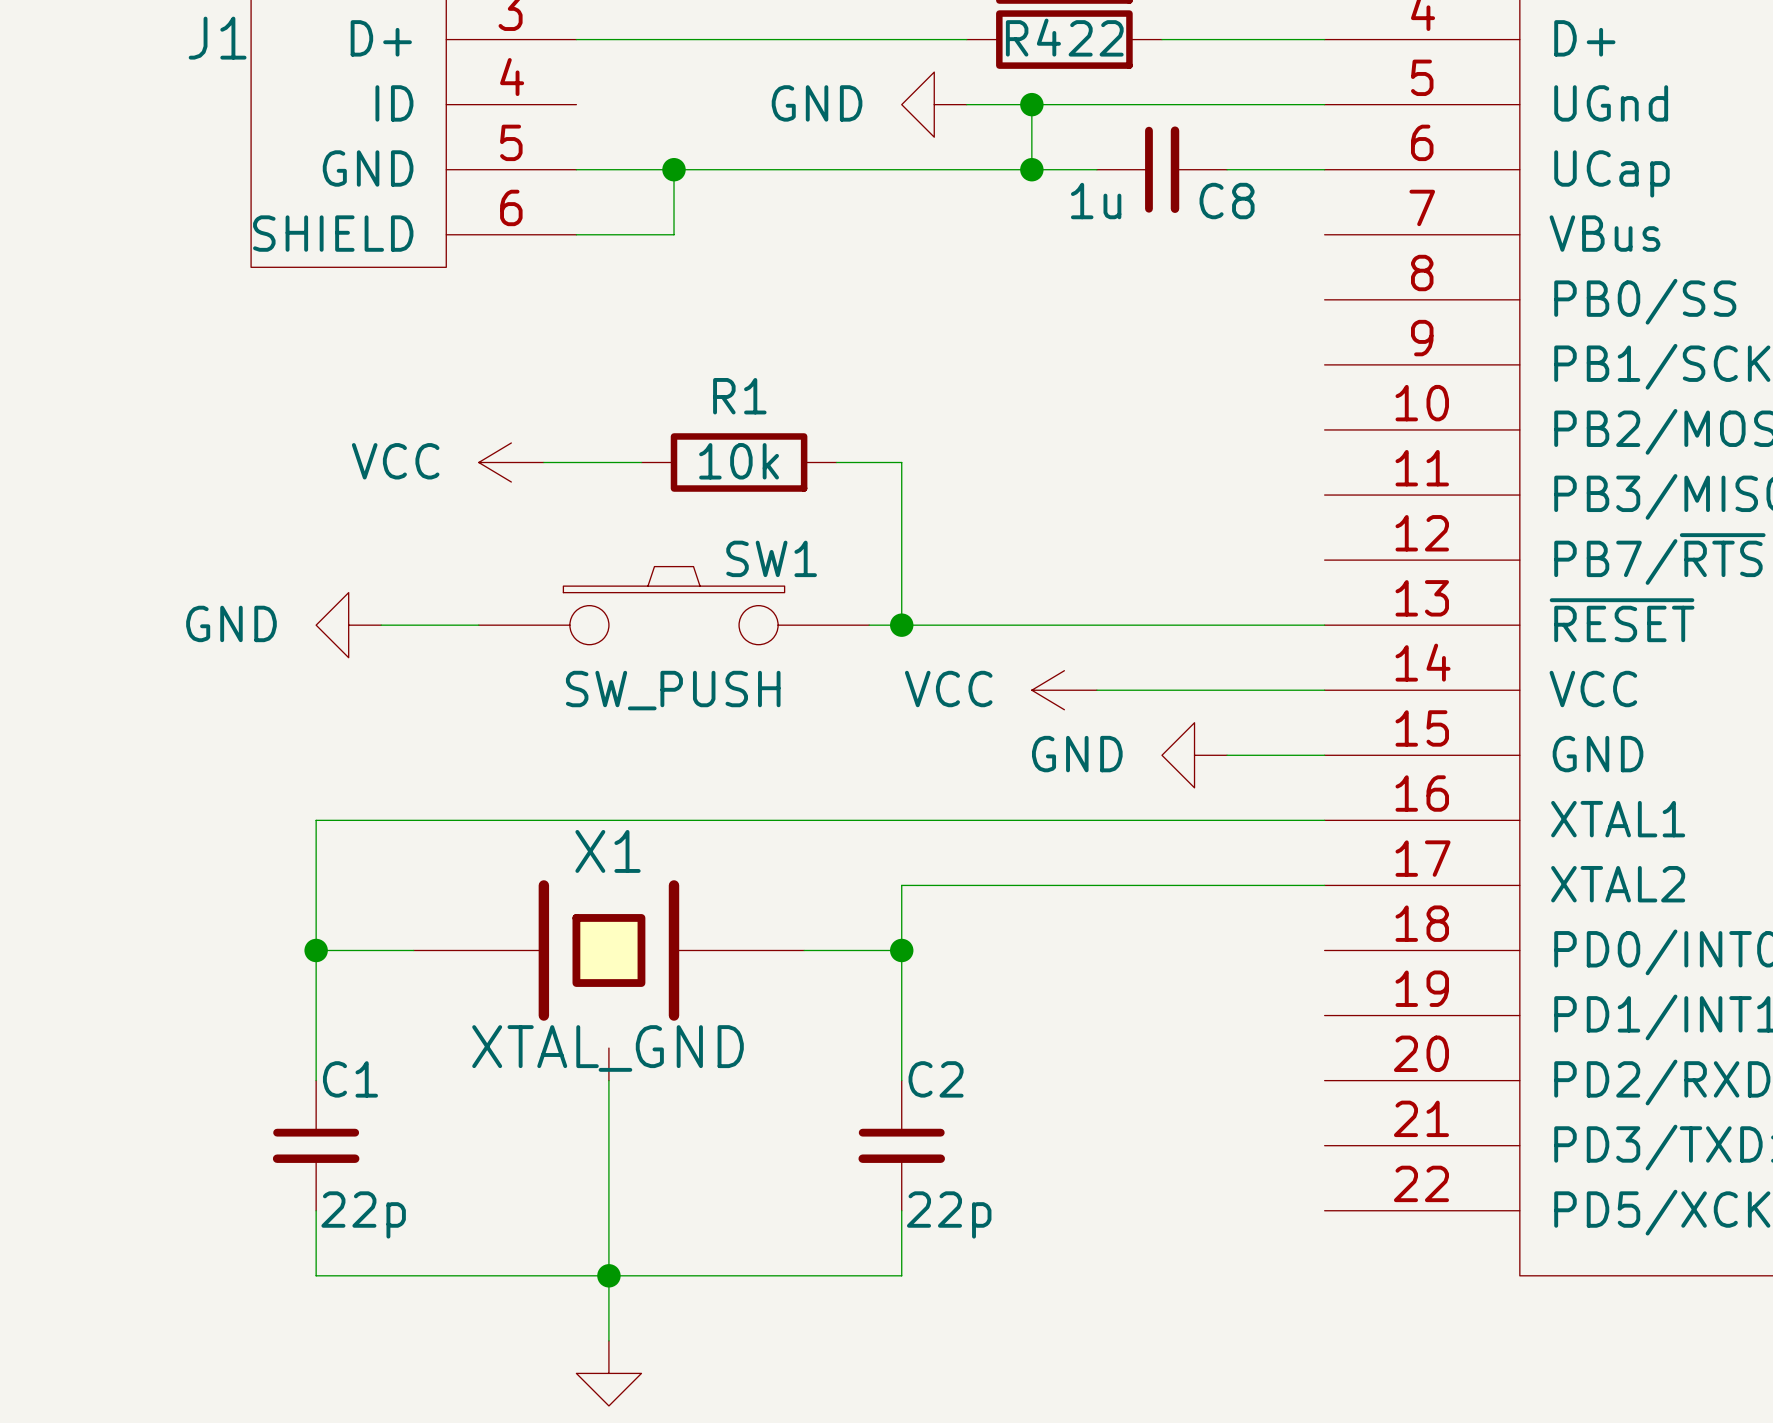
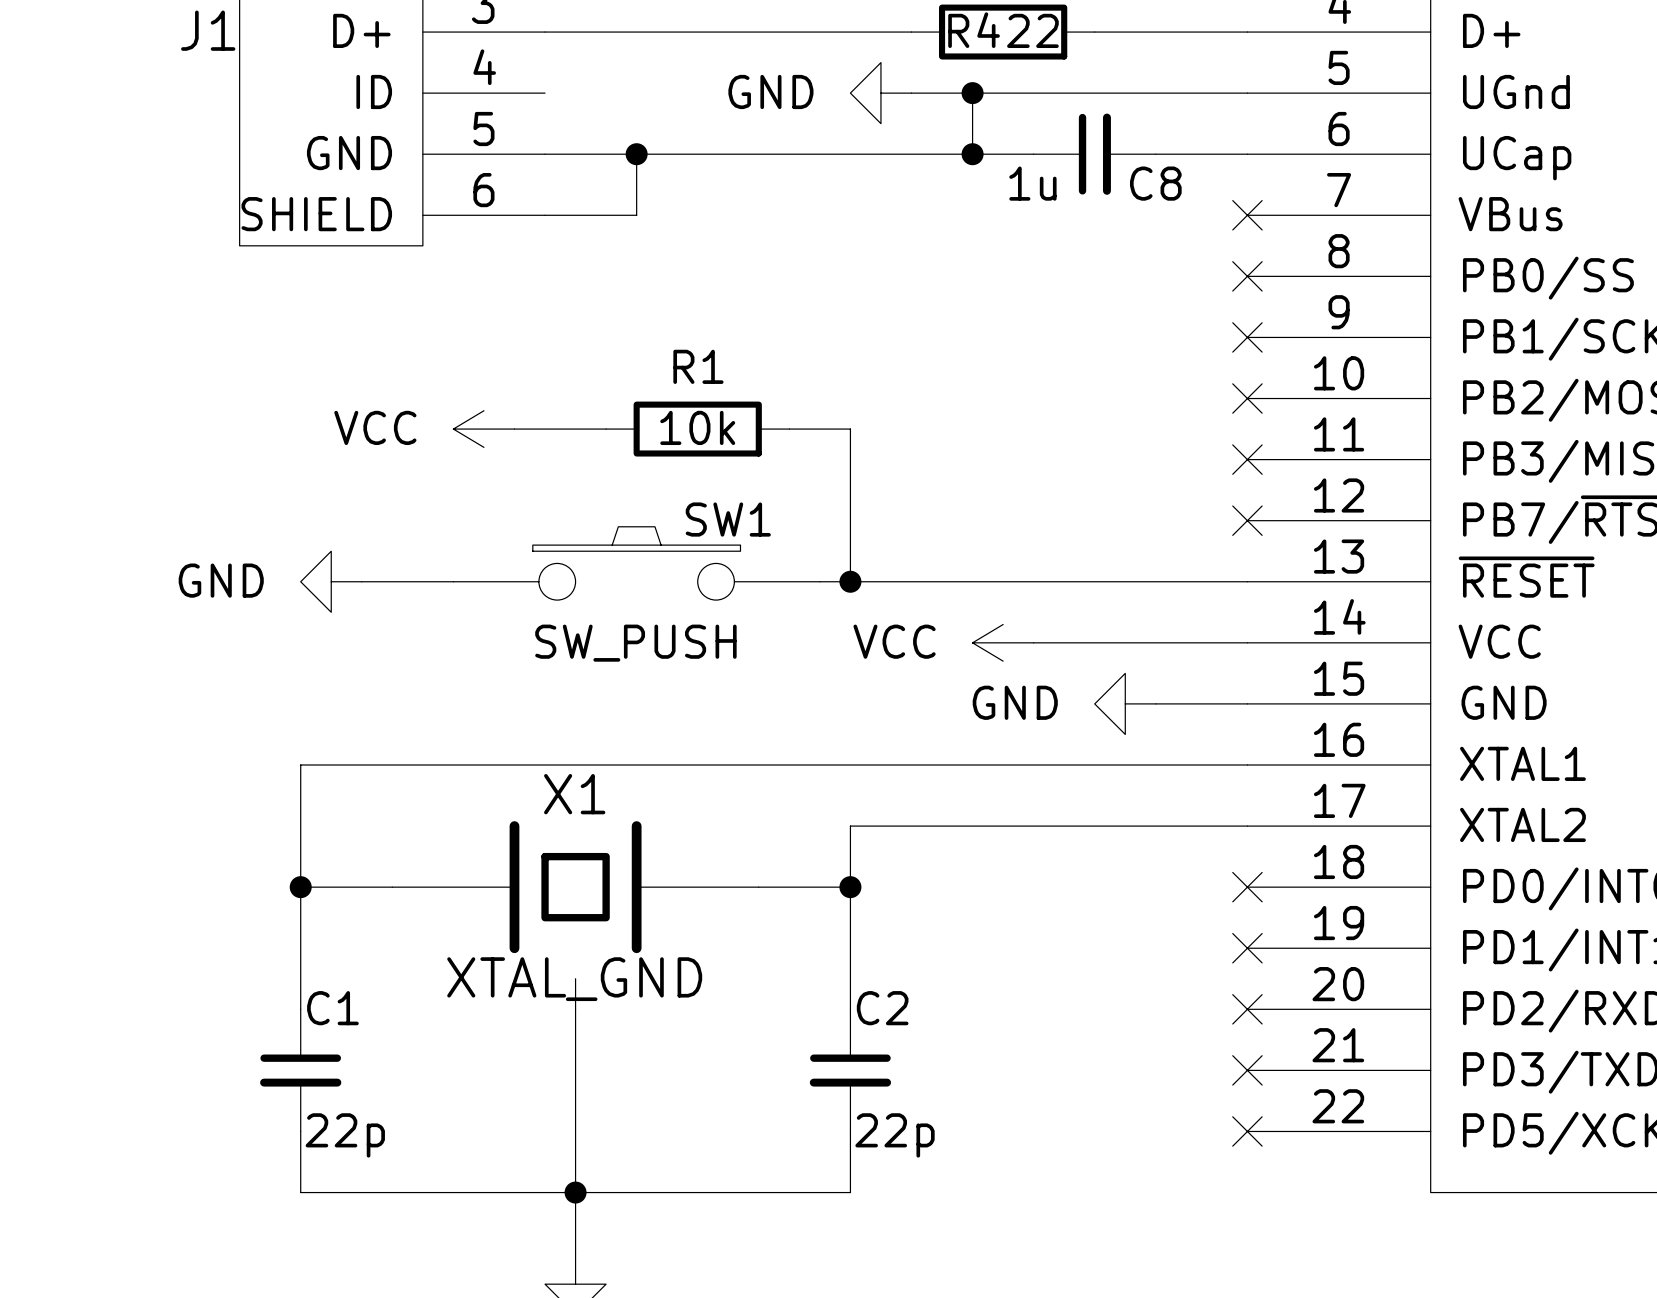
no-connect mark: none -> (1247, 215)
no-connect mark: none -> (1247, 276)
no-connect mark: none -> (1247, 337)
no-connect mark: none -> (1247, 398)
no-connect mark: none -> (1247, 459)
no-connect mark: none -> (1247, 520)
no-connect mark: none -> (1247, 887)
no-connect mark: none -> (1247, 948)
no-connect mark: none -> (1247, 1009)
no-connect mark: none -> (1247, 1070)
no-connect mark: none -> (1247, 1131)

